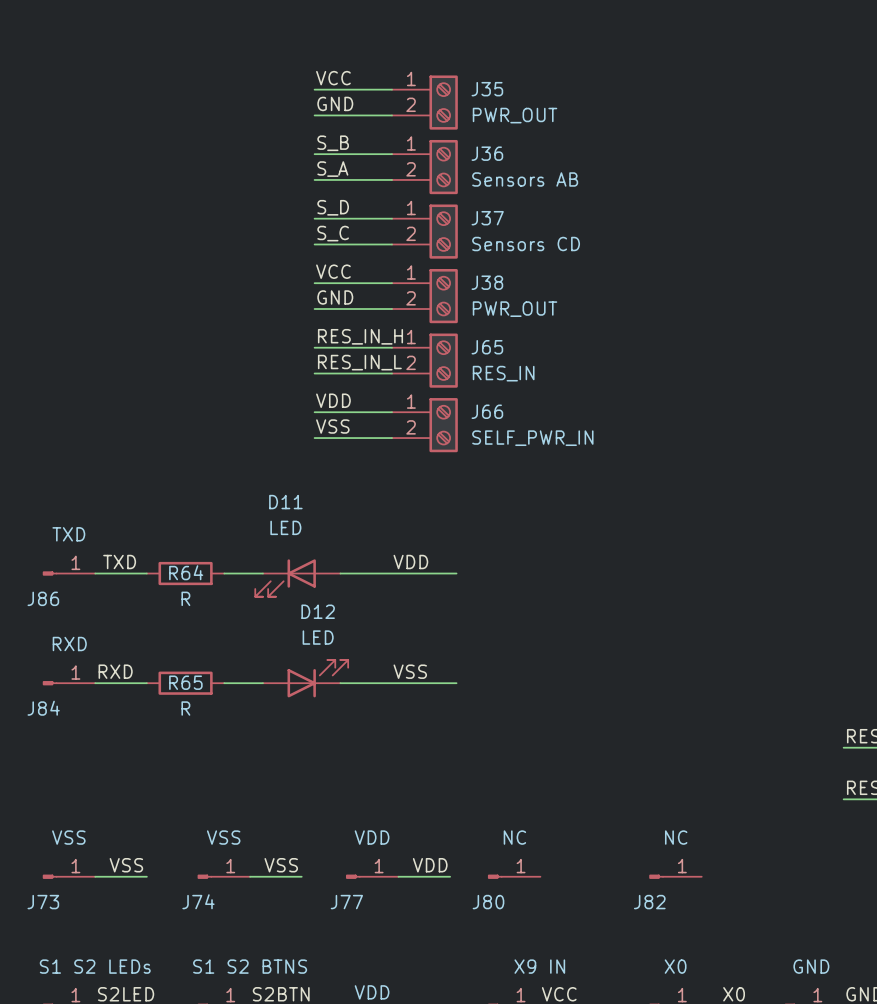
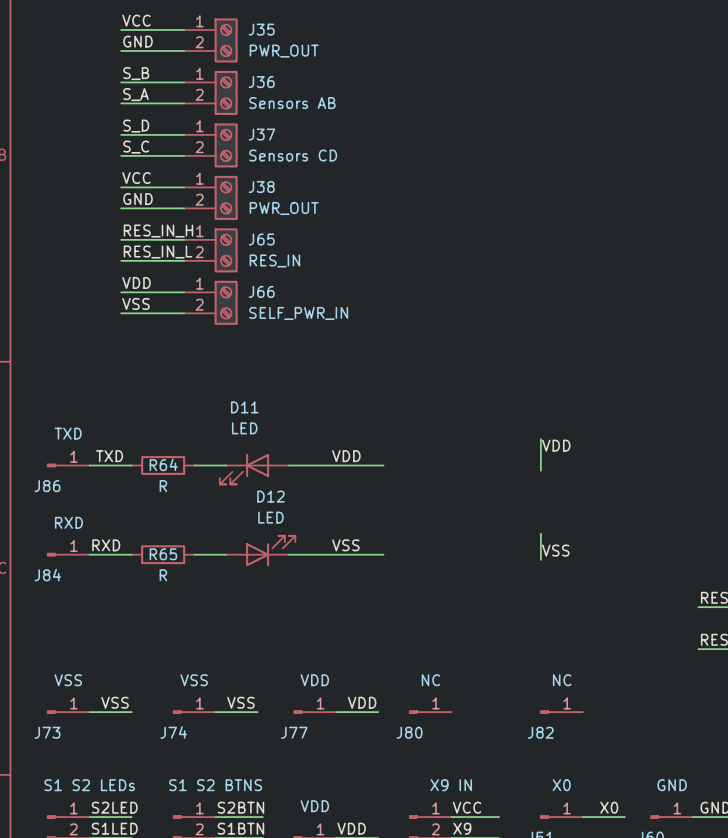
label: none -> VCC (136, 20)
label: none -> GND (137, 41)
label: VCC (333, 78) -> none
wire: (314, 89) (392, 89) -> (121, 29) (184, 29)
J35 position: (424, 102) -> (210, 40)
label: GND (335, 103) -> none
wire: (314, 115) (392, 115) -> (121, 50) (184, 50)
label position: S_B (333, 143) -> S_B (136, 73)
wire: (314, 154) (392, 154) -> (121, 82) (184, 82)
J36 position: (424, 167) -> (210, 92)
label position: S_A (332, 169) -> S_A (136, 94)
wire: (314, 179) (392, 179) -> (121, 103) (184, 103)
label position: S_D (333, 207) -> S_D (136, 126)
wire: (314, 218) (392, 218) -> (121, 134) (184, 134)
label: none -> VCC (136, 178)
J37 position: (424, 231) -> (210, 145)
label position: S_C (333, 233) -> S_C (136, 147)
wire: (314, 244) (392, 244) -> (121, 155) (184, 155)
label: none -> GND (137, 199)
label: VCC (333, 271) -> none
wire: (314, 283) (392, 283) -> (121, 187) (184, 187)
J38 position: (424, 296) -> (210, 197)
label: GND (335, 297) -> none
wire: (314, 309) (392, 309) -> (121, 208) (184, 208)
label position: RES_IN_H (360, 336) -> RES_IN_H (158, 231)
wire: (314, 347) (392, 347) -> (121, 239) (184, 239)
label: none -> VDD (136, 282)
J65 position: (424, 360) -> (210, 250)
label position: RES_IN_L (359, 362) -> RES_IN_L (157, 251)
wire: (314, 373) (392, 373) -> (121, 260) (184, 260)
label: VDD (333, 400) -> none
wire: (314, 412) (392, 412) -> (121, 292) (184, 292)
J66 position: (424, 425) -> (210, 302)
label position: VSS (332, 426) -> VSS (136, 303)
wire: (314, 438) (392, 438) -> (121, 313) (184, 313)
wire: none -> (540, 439) (540, 470)
label: none -> VDD (556, 445)
wire: none -> (540, 533) (540, 559)
label: none -> VSS (555, 550)

